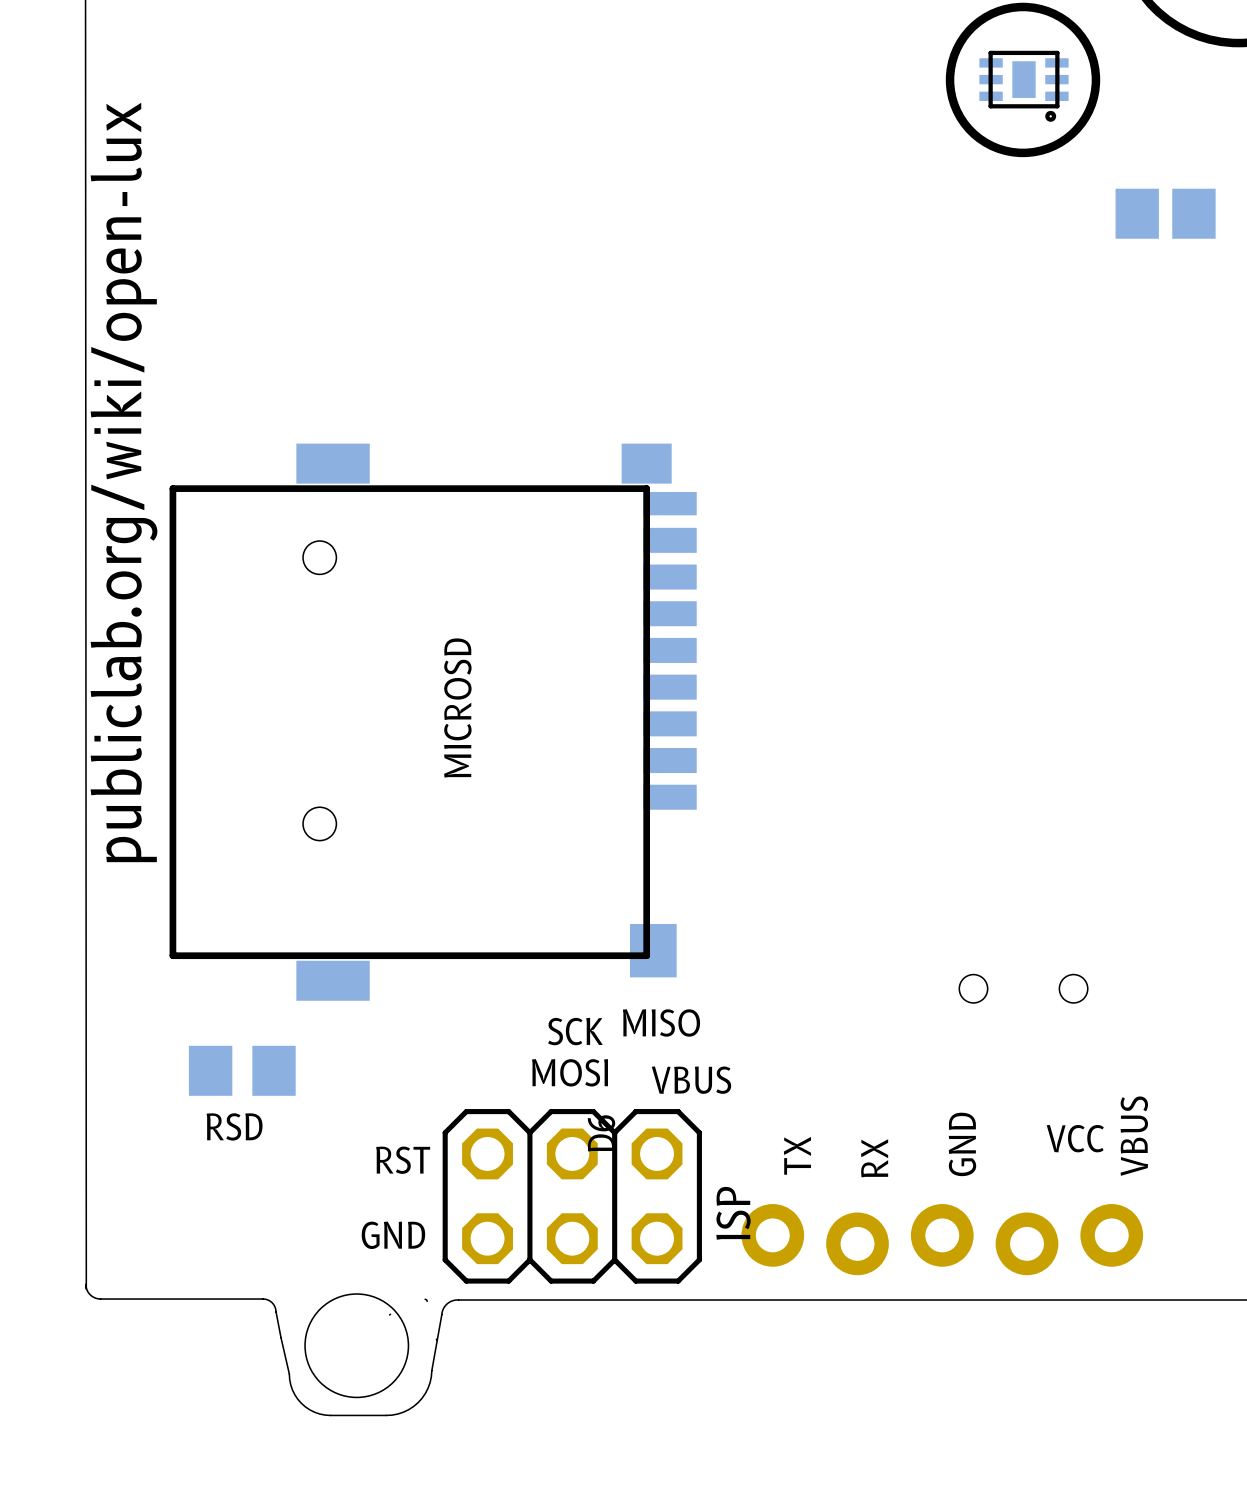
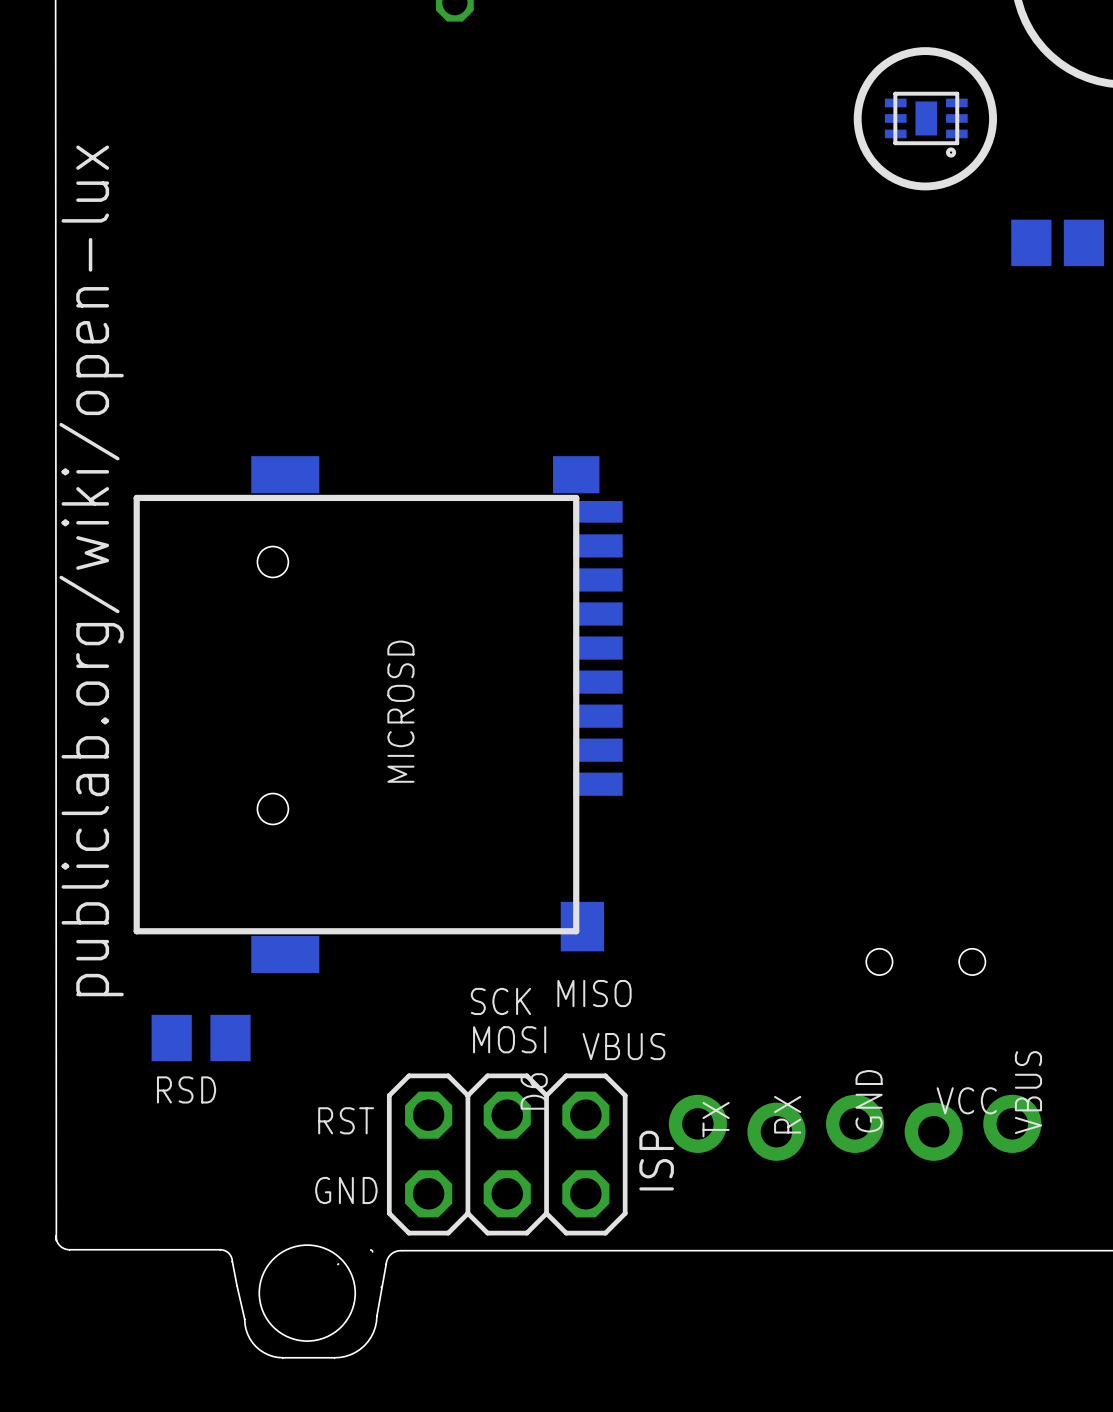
part position: (942, 1239) -> (855, 1127)

